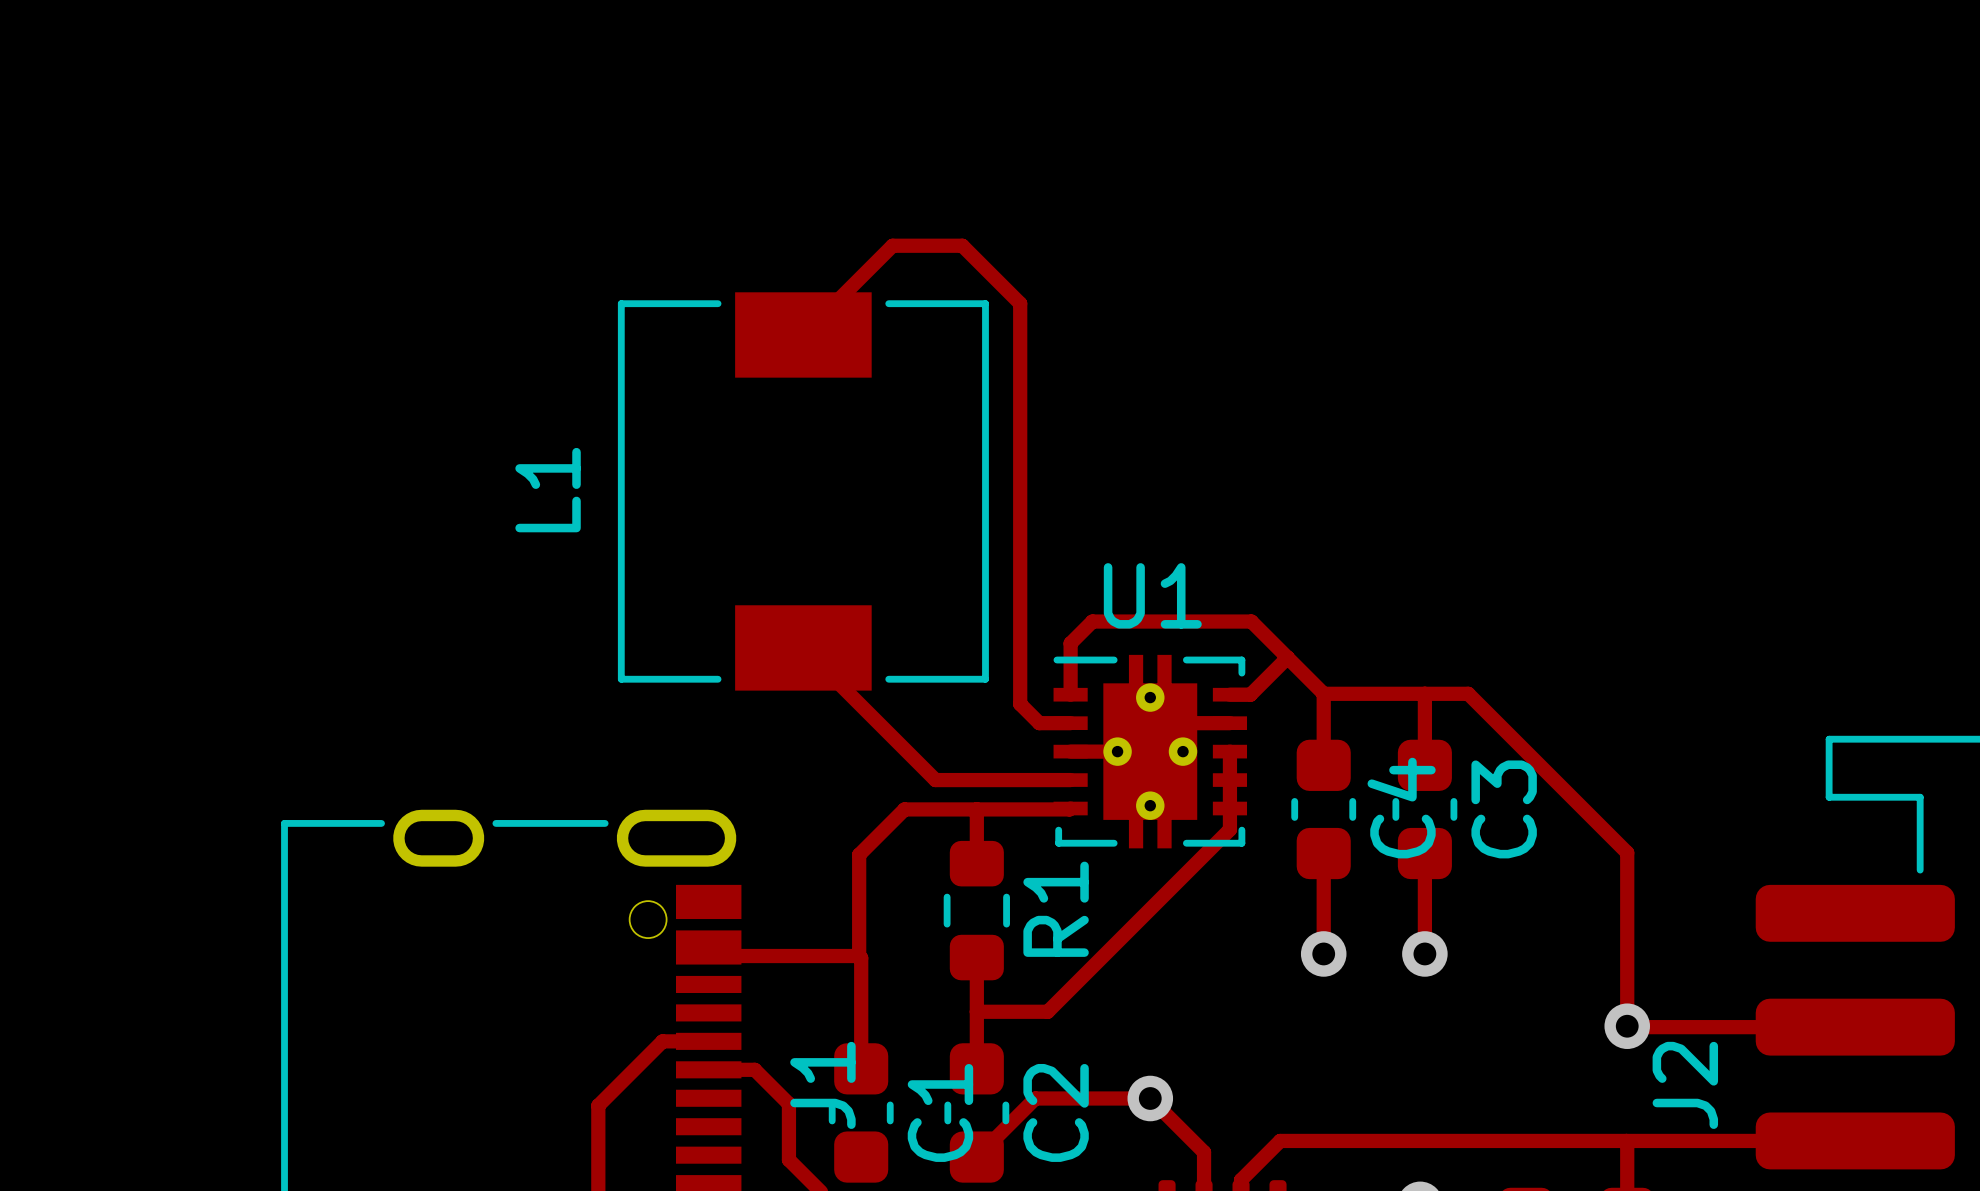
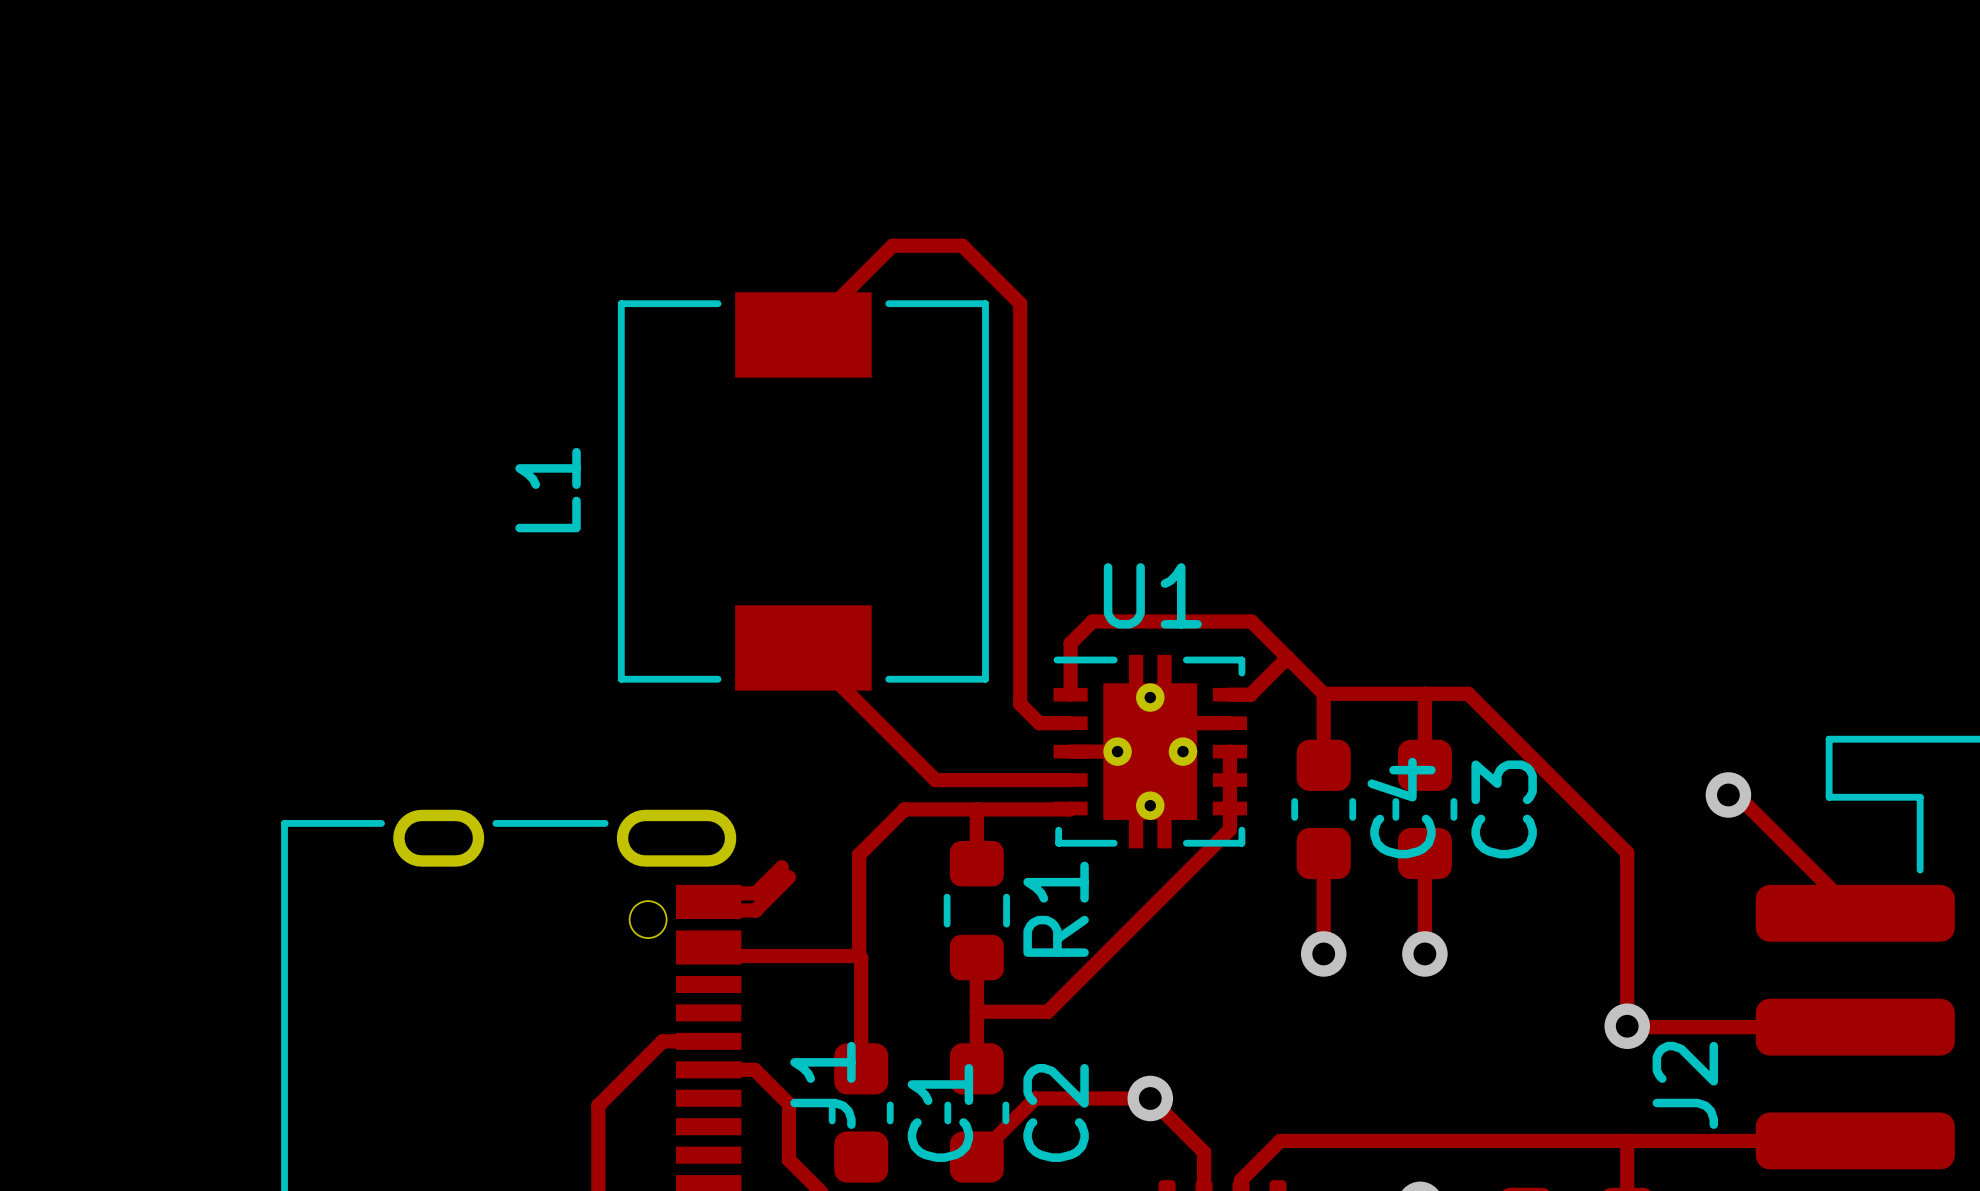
via: none -> (1728, 794)
track: none -> (1736, 794) (1855, 913)
track: none -> (781, 867) (755, 893) (708, 893)
track: none -> (788, 877) (755, 910) (708, 910)

